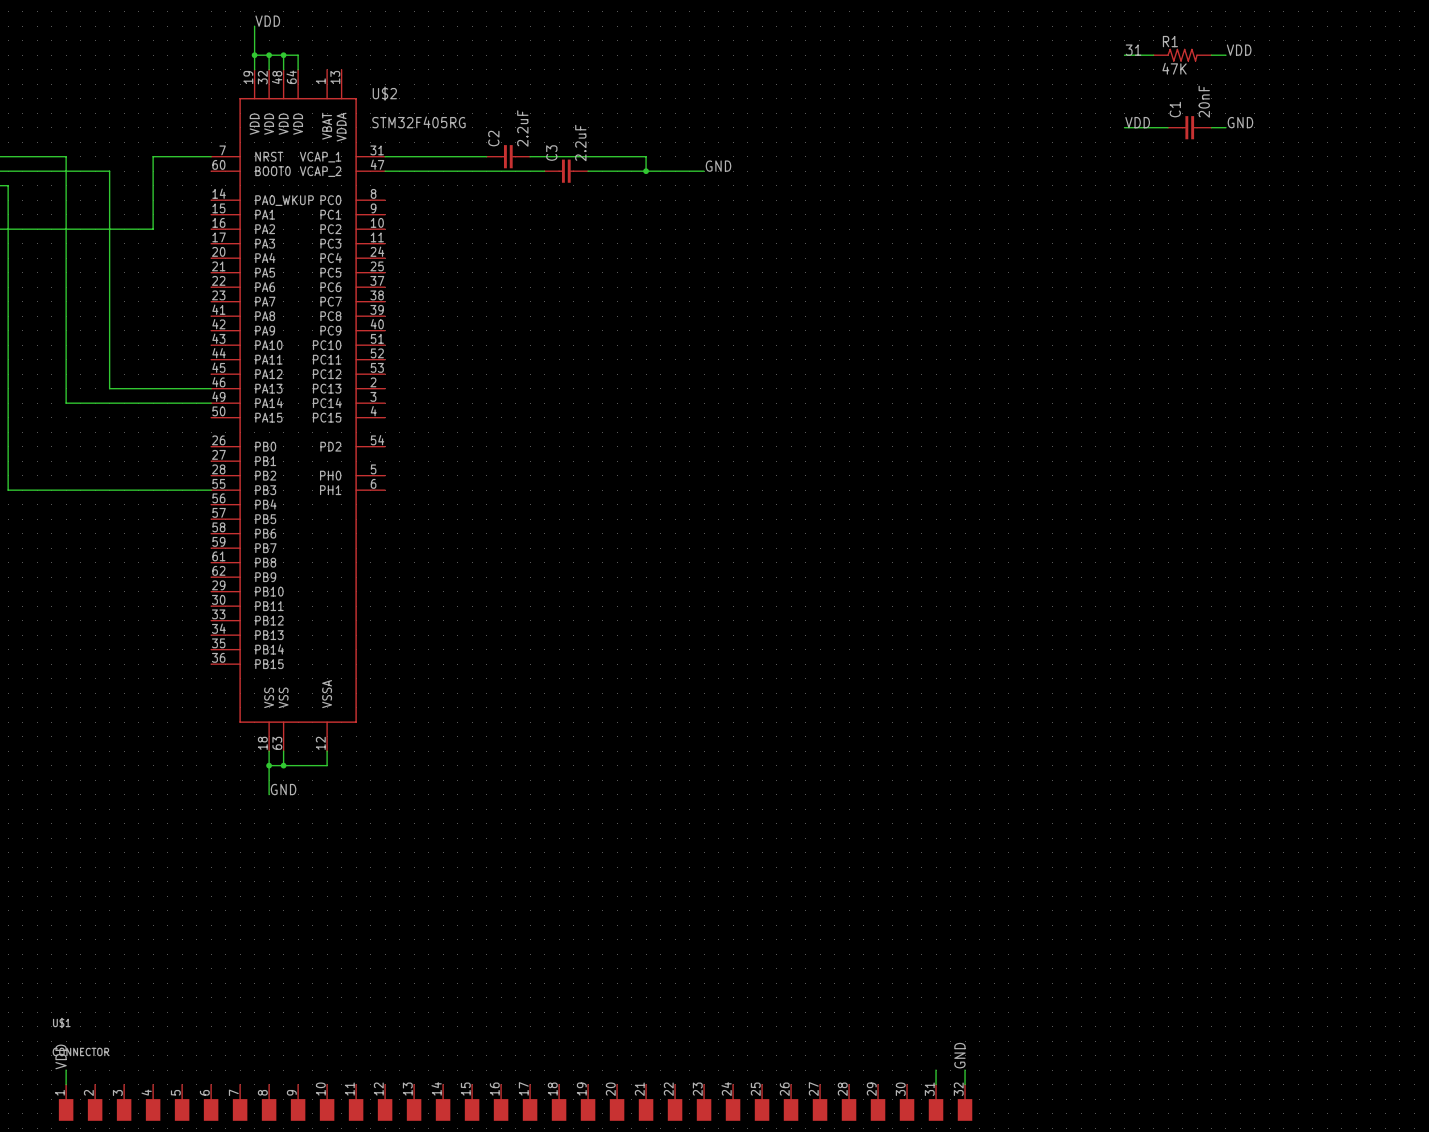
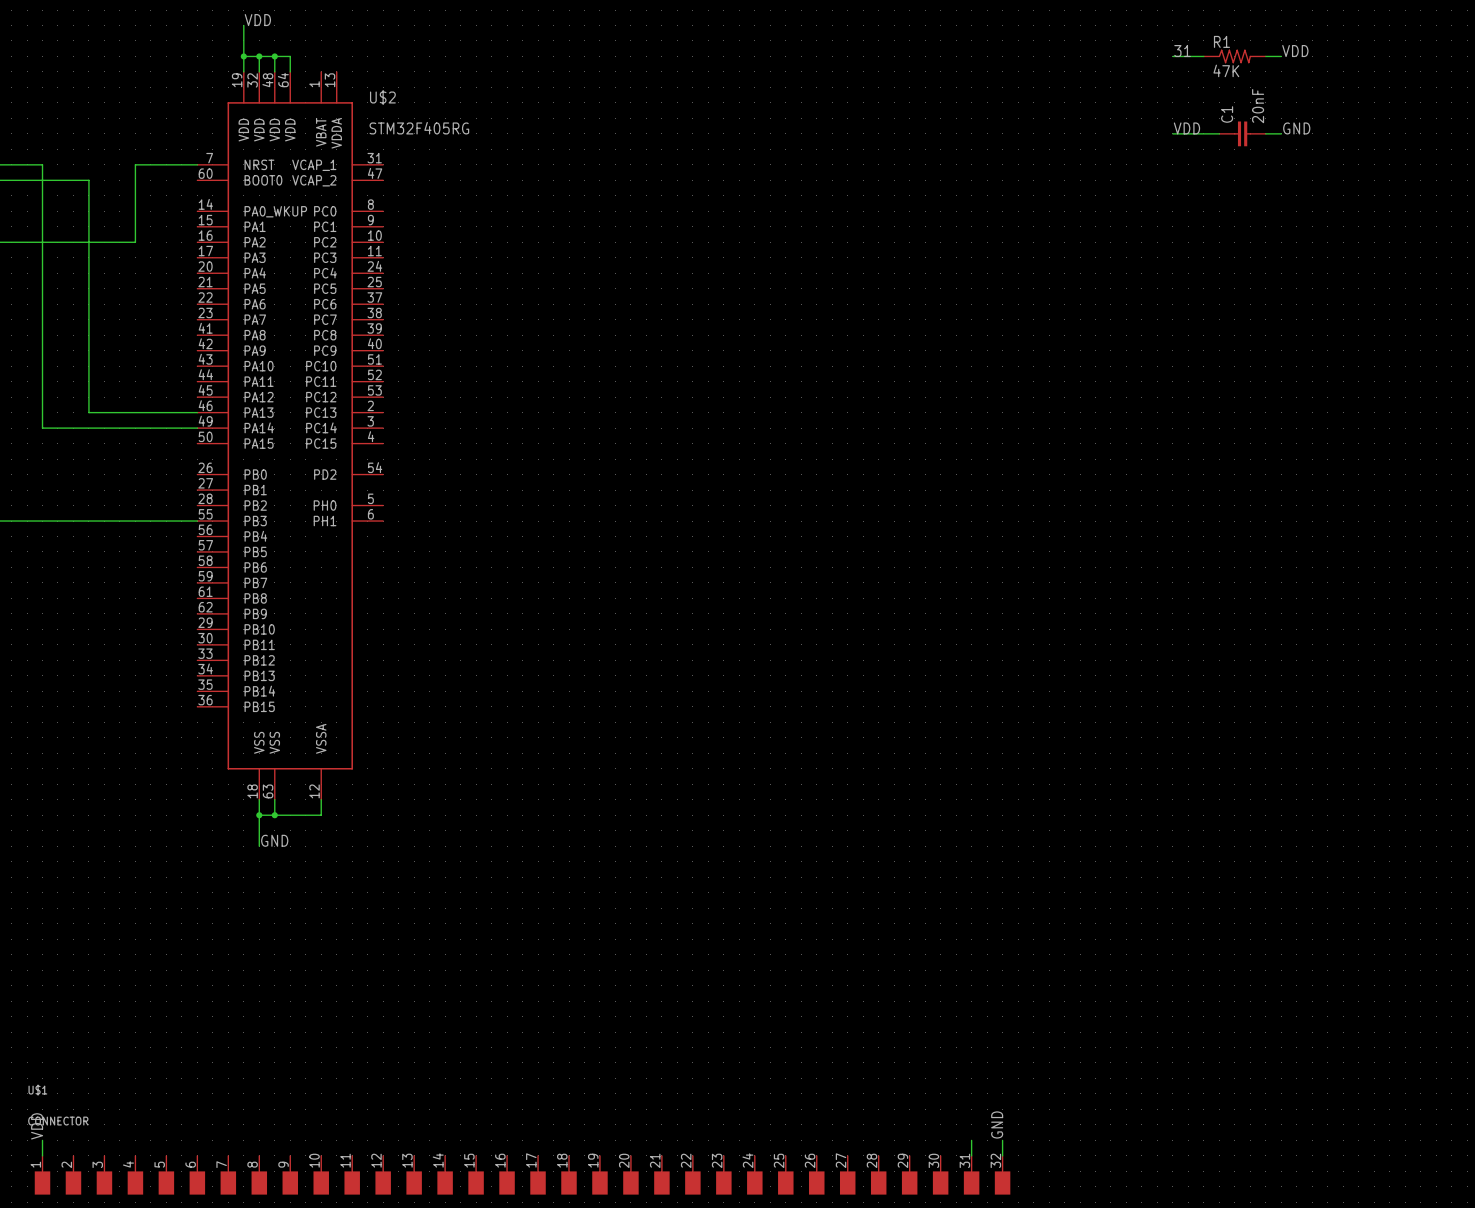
wire: (385, 156) (486, 156) -> none
C2: 2.2uF (508, 156) -> none
wire: (530, 156) (646, 156) (646, 171) -> none
label: GND (718, 166) -> none
wire: (385, 171) (544, 171) -> none
C3: 2.2uF (566, 171) -> none
wire: (588, 171) (704, 171) -> none
junction: (646, 171) -> none

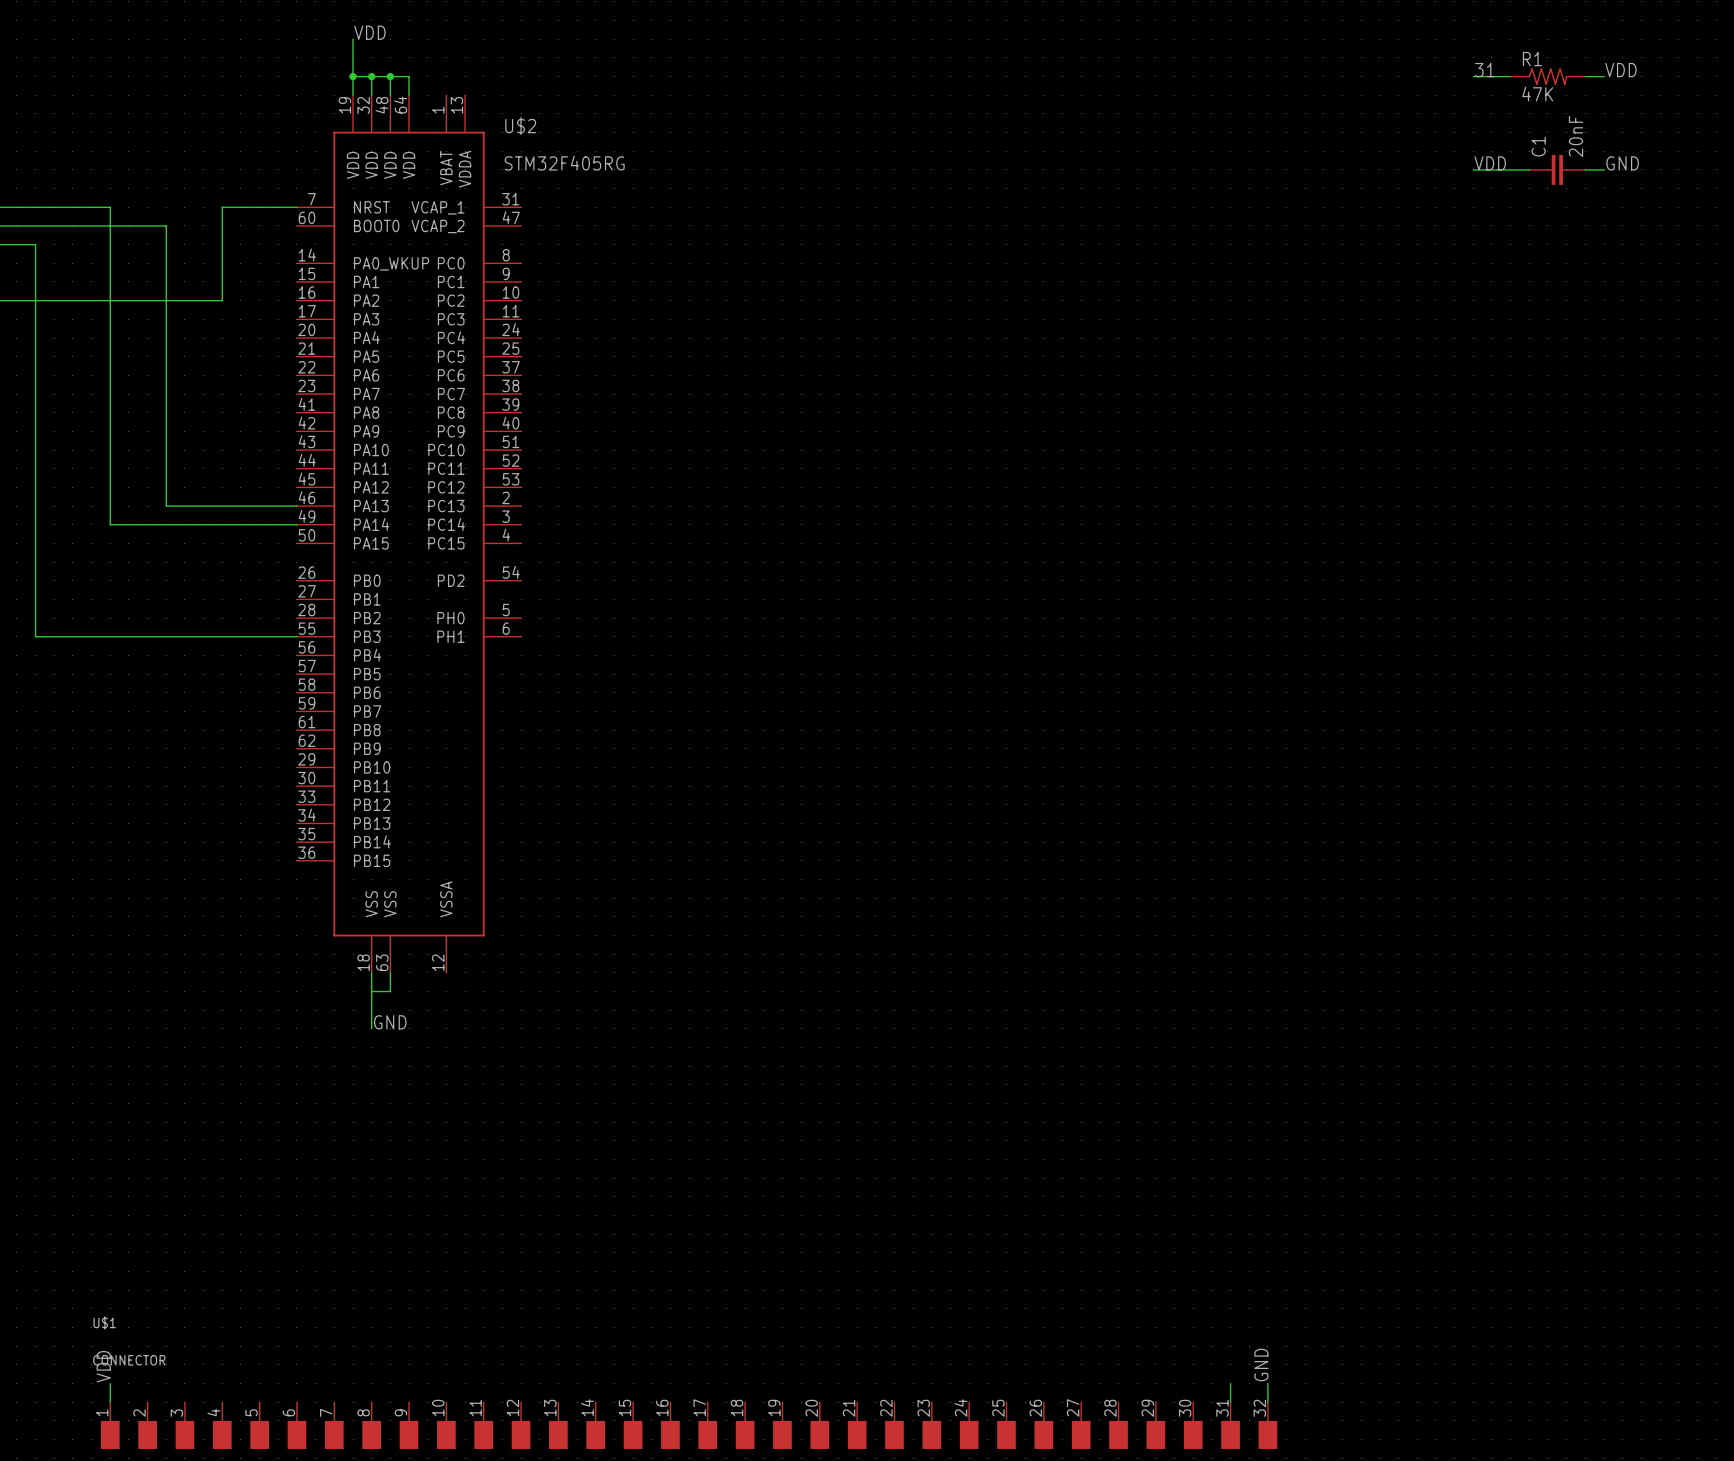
wire: (321, 799) (321, 815) (274, 815) -> none
junction: (259, 815) -> none
junction: (274, 815) -> none

